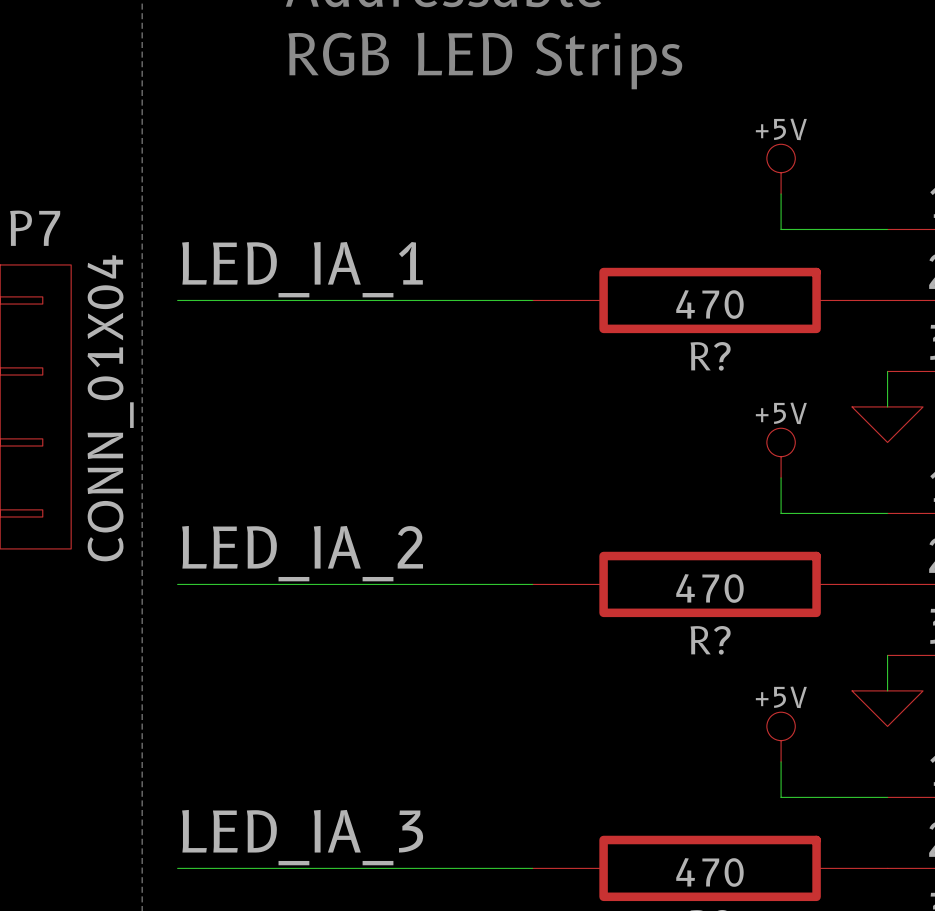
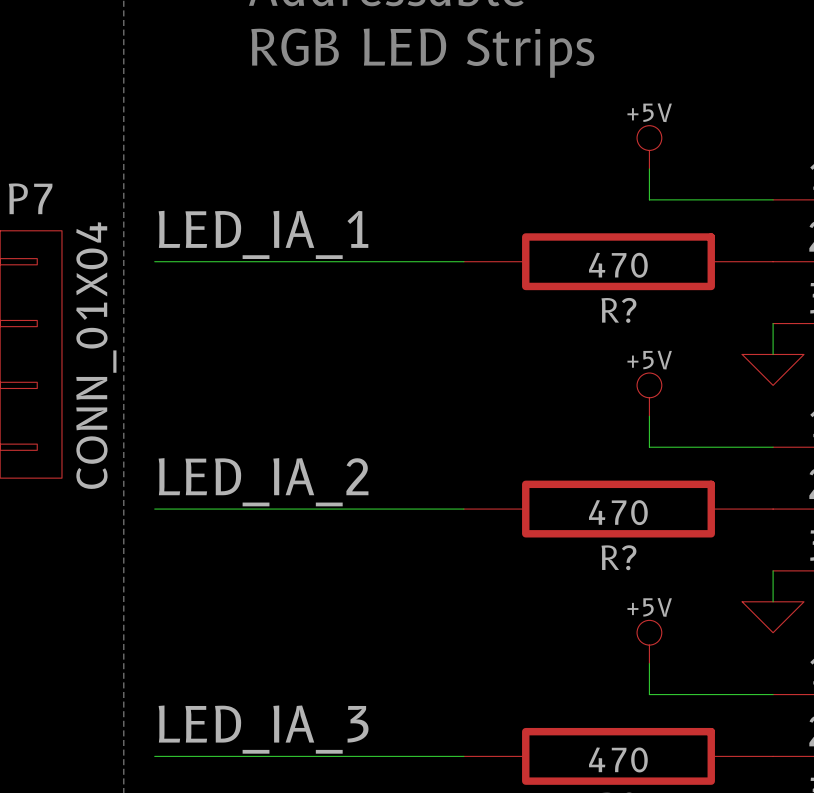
power symbol position: +5V (781, 169) -> +5V (649, 147)
wire: (781, 193) (781, 229) -> (649, 168) (649, 199) (680, 199)
power symbol position: +5V (781, 453) -> +5V (649, 394)
wire: (781, 477) (781, 513) -> (649, 416) (649, 447) (680, 447)
power symbol position: +5V (781, 737) -> +5V (649, 642)
wire: (781, 761) (781, 797) -> (649, 663) (649, 694) (680, 694)

